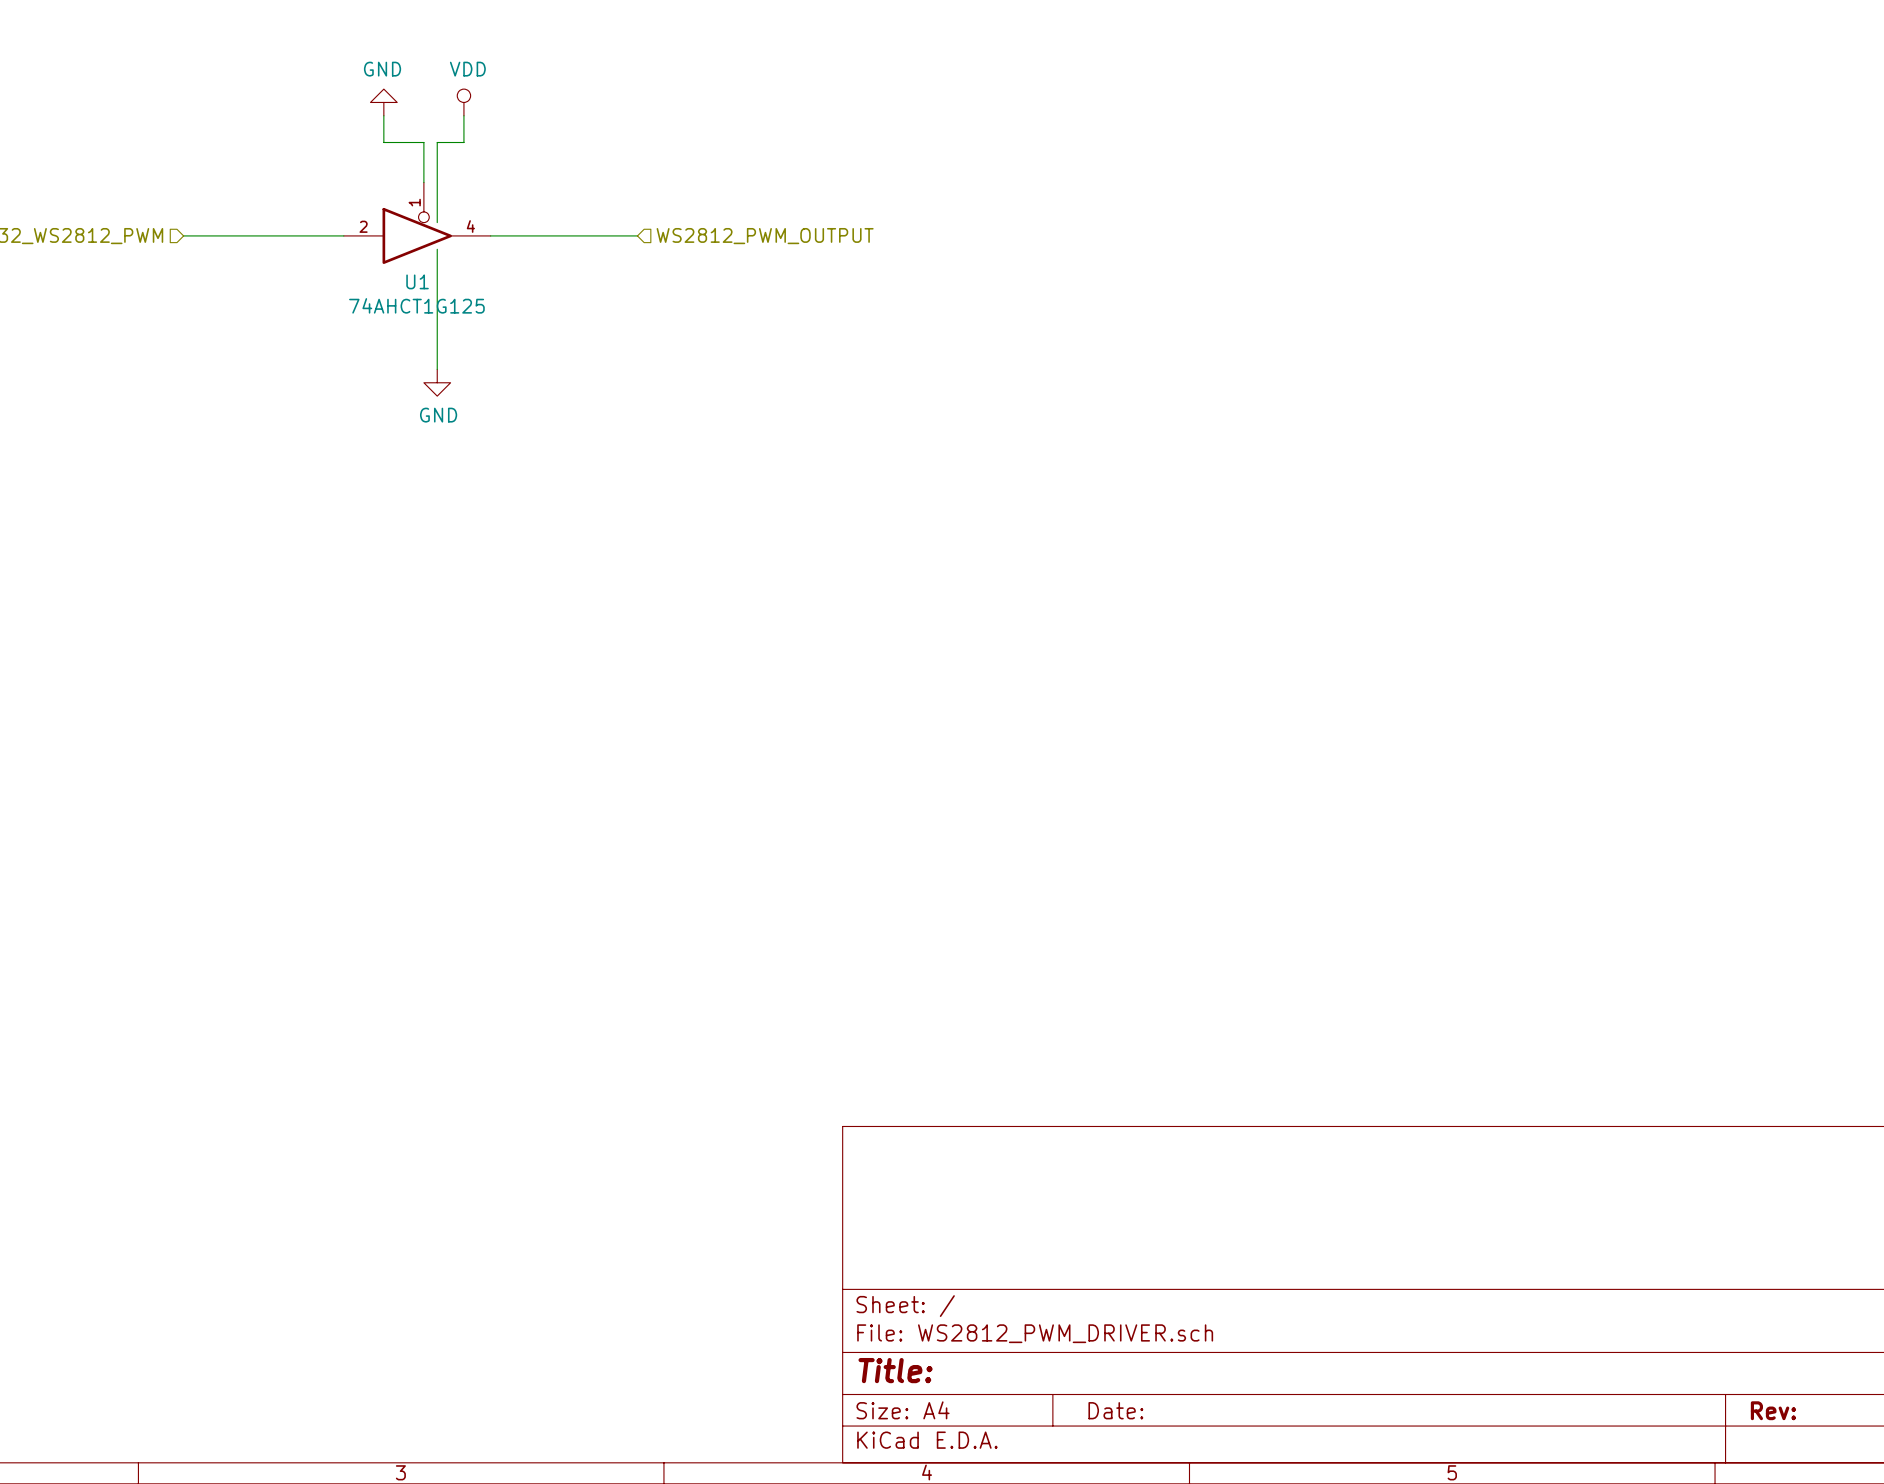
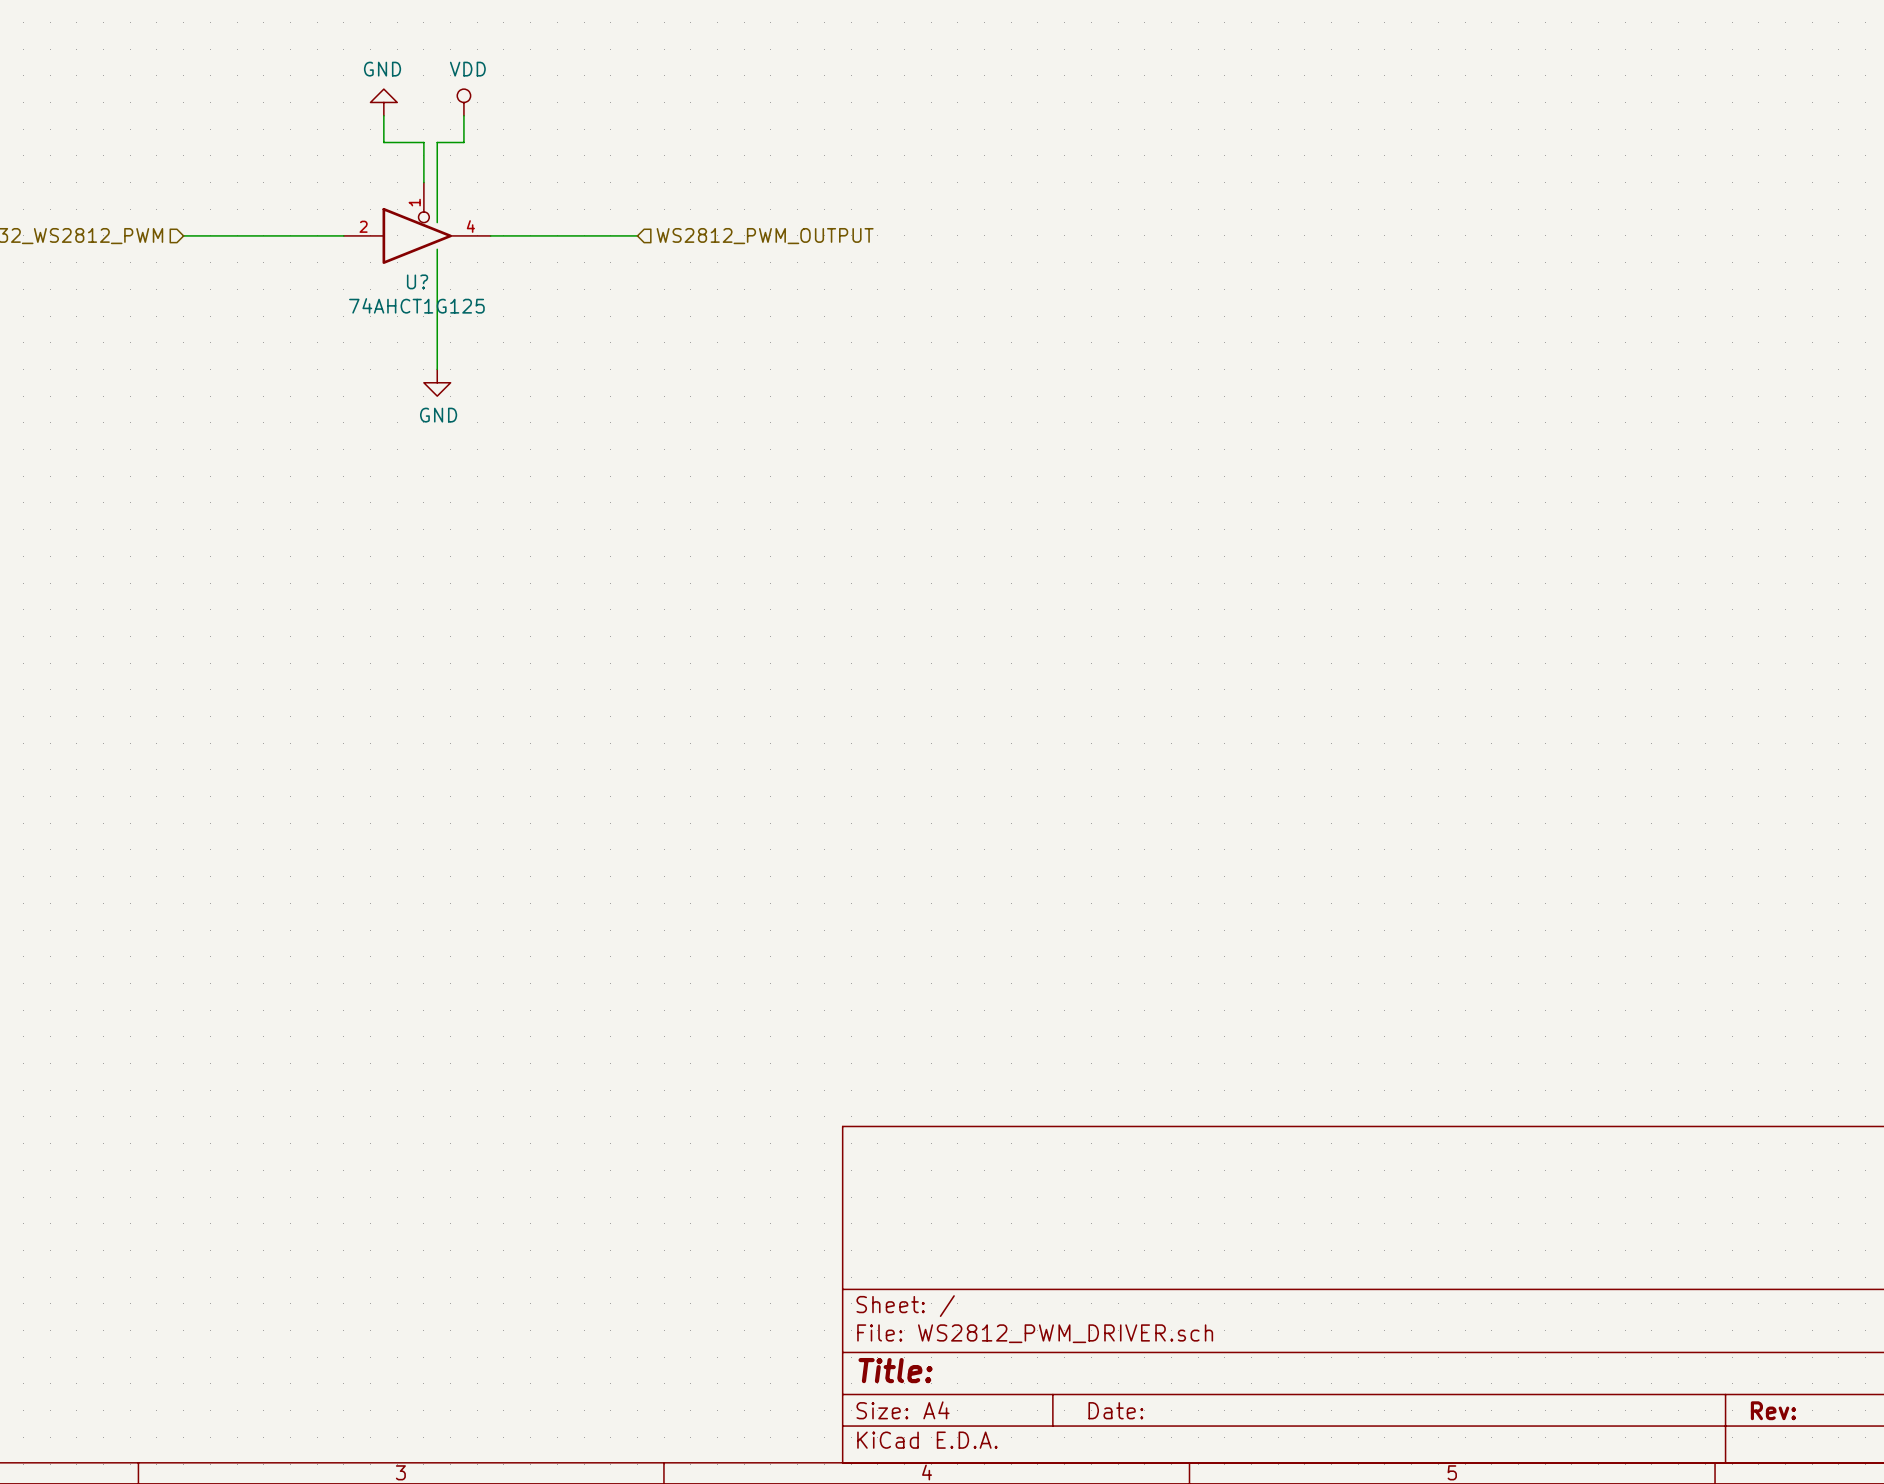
U1 name: U1 (417, 281) -> U? (417, 281)

